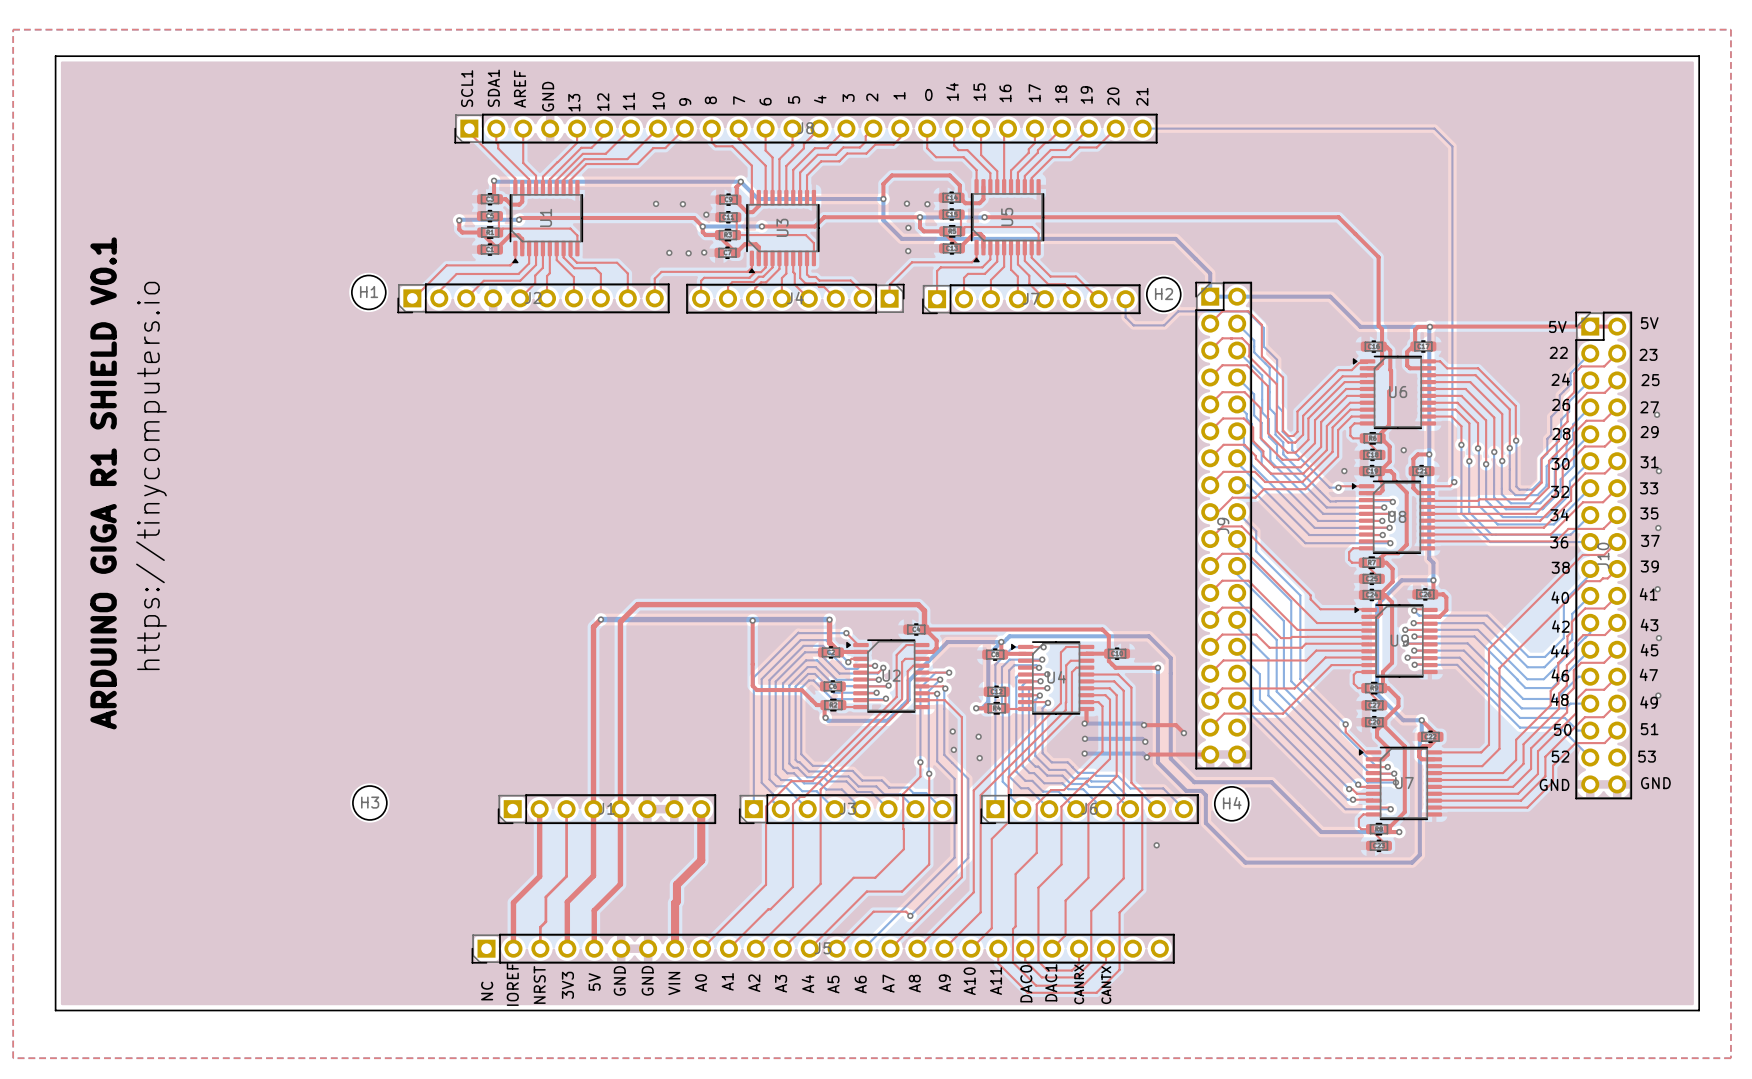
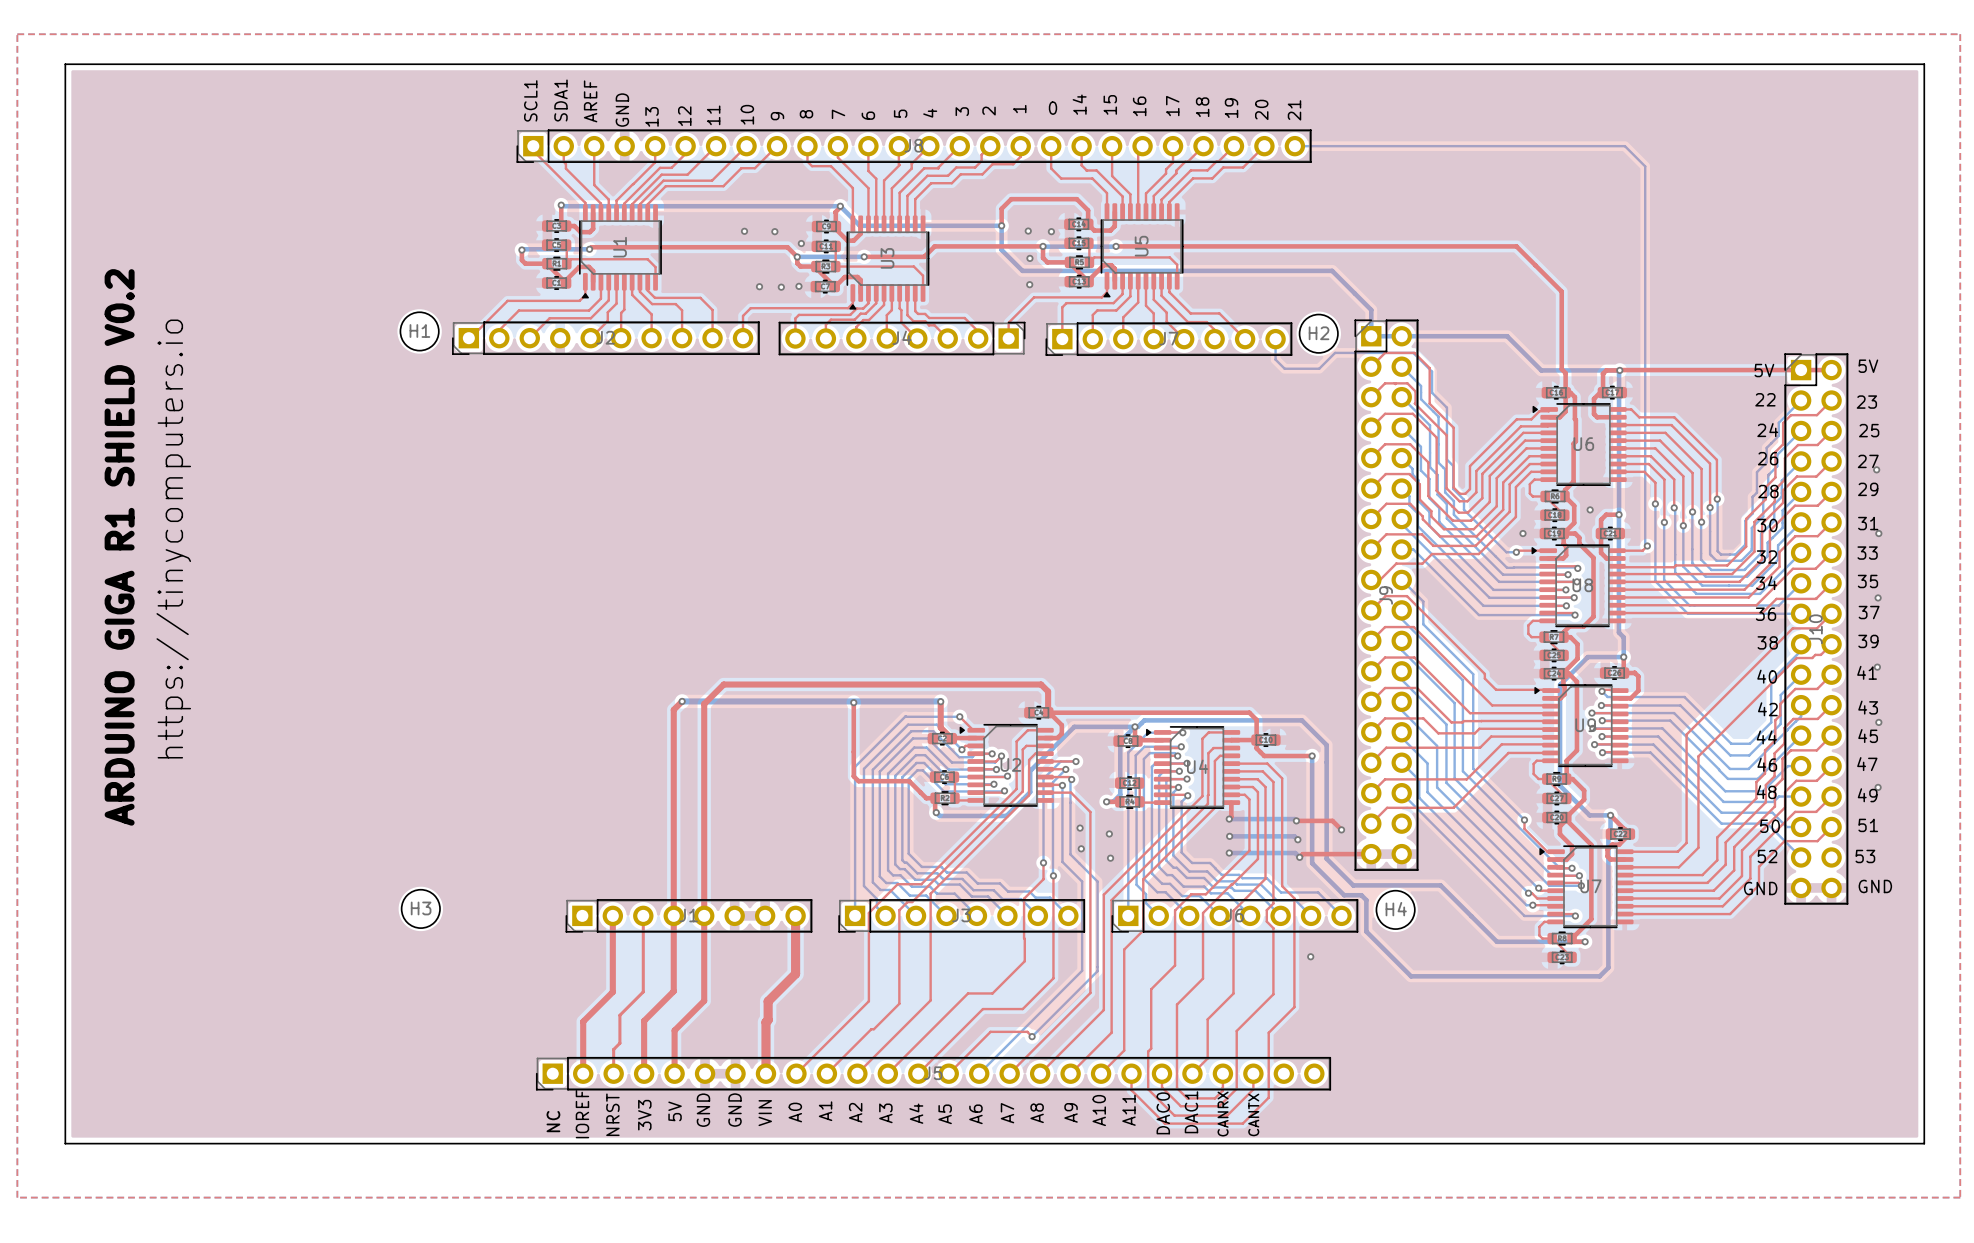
text: ARDUINO GIGA R1 SHIELD V0.1 (103, 483) -> ARDUINO GIGA R1 SHIELD V0.2 (119, 547)

